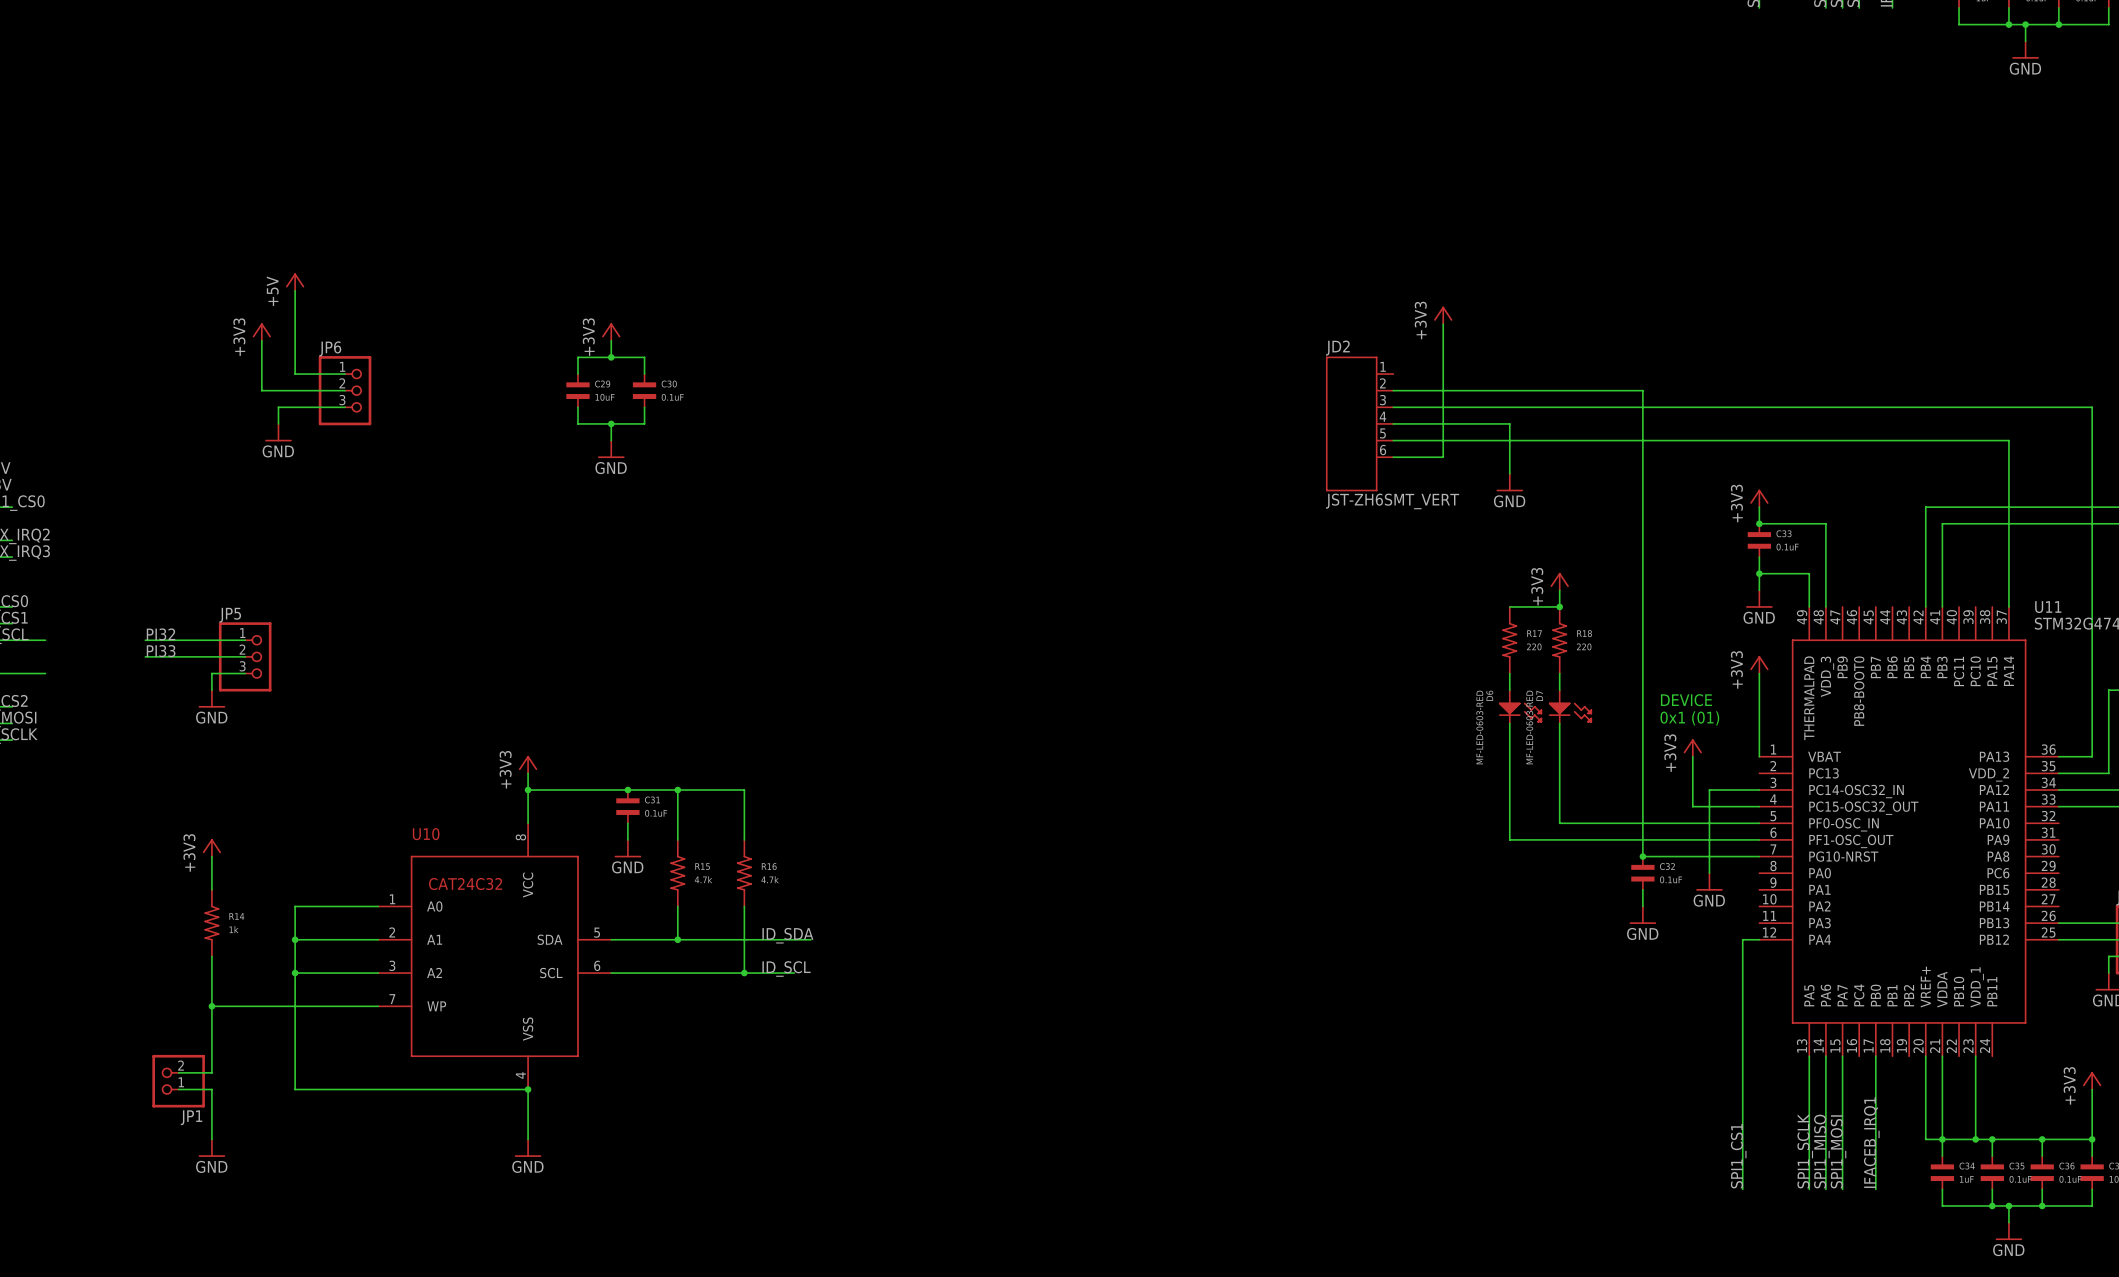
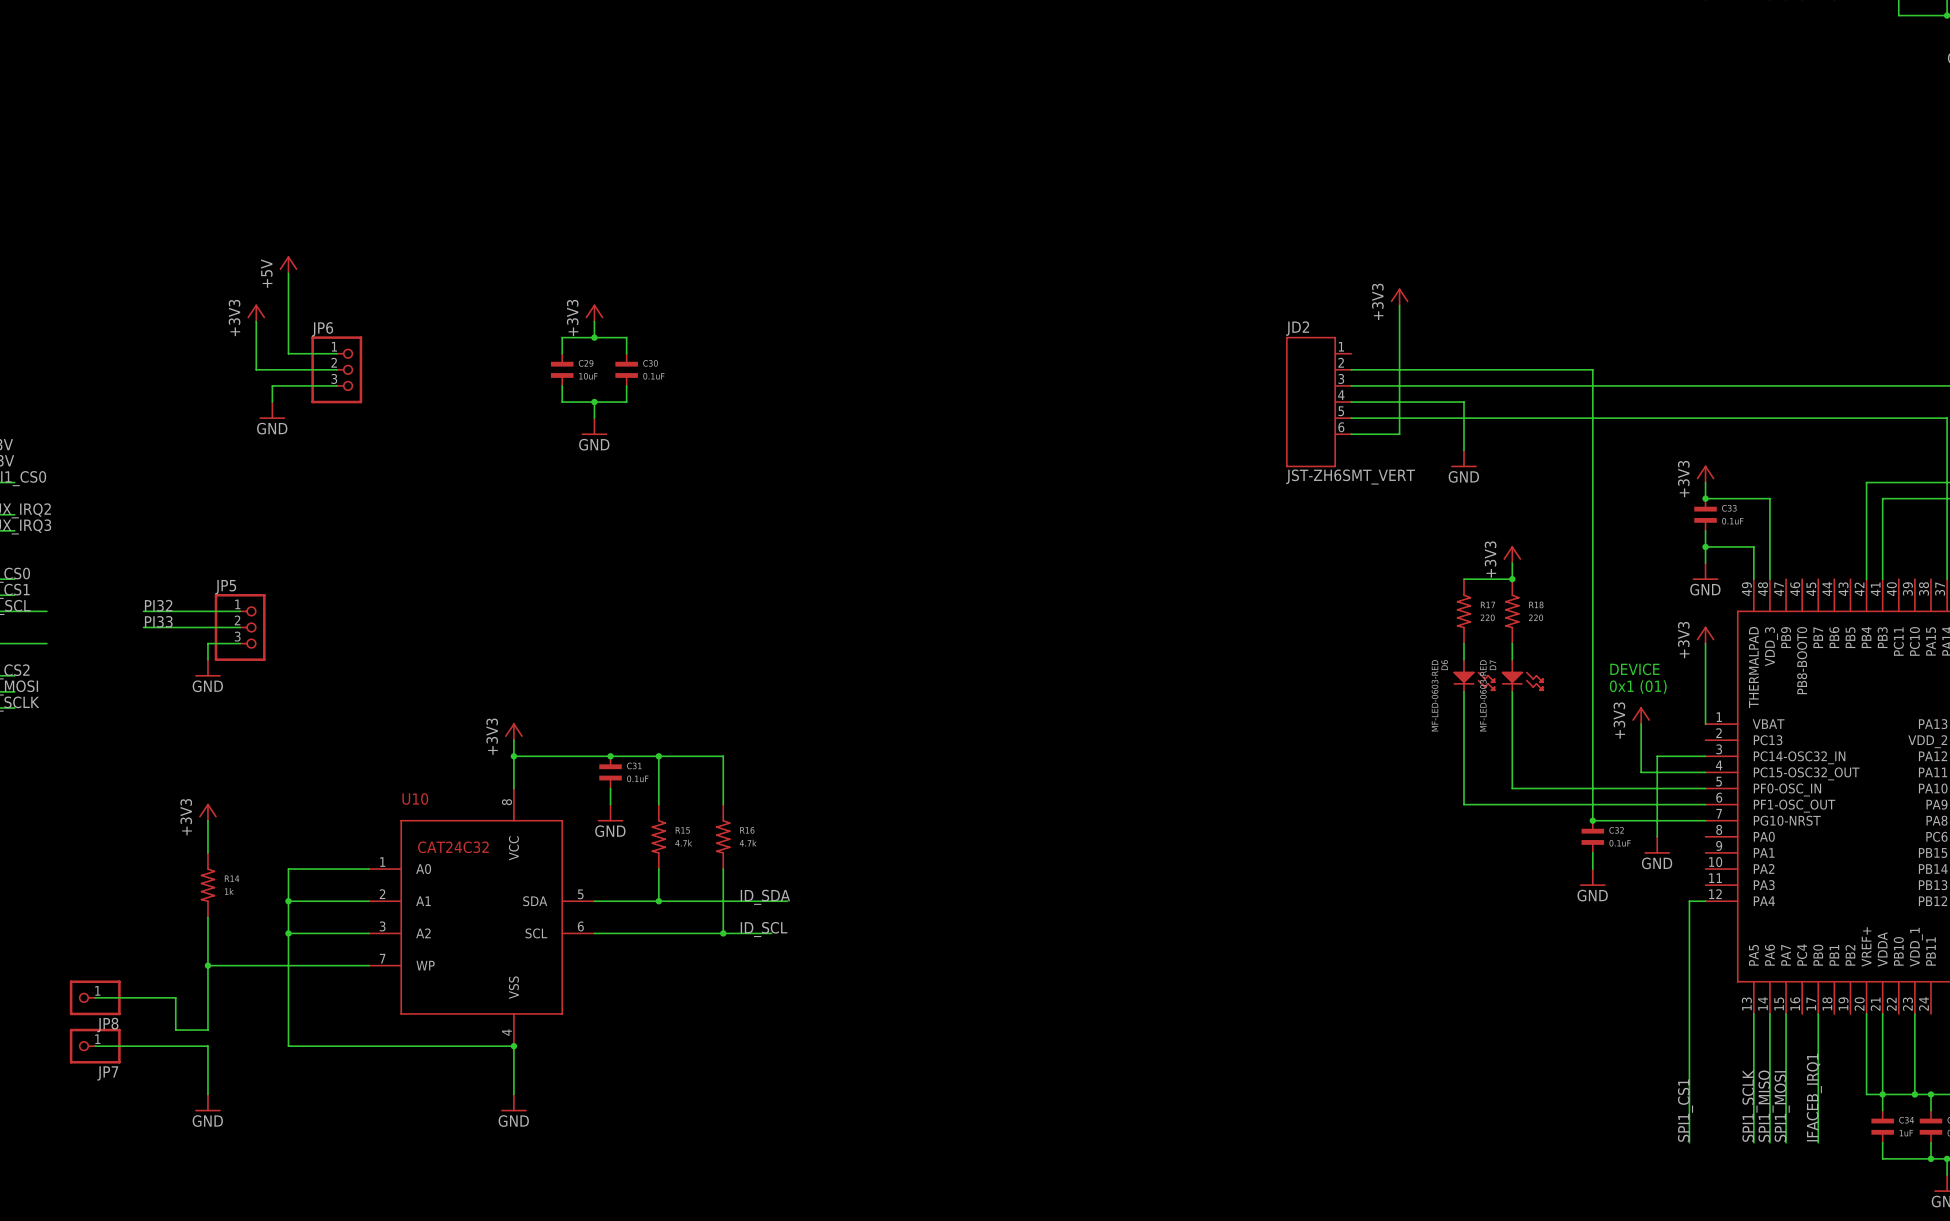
wire: none -> (95, 997) (175, 997) (175, 1030)
JP8: none -> (95, 997)
JP1: (178, 1081) -> none
wire: none -> (95, 1046) (175, 1046)
JP7: none -> (95, 1046)

